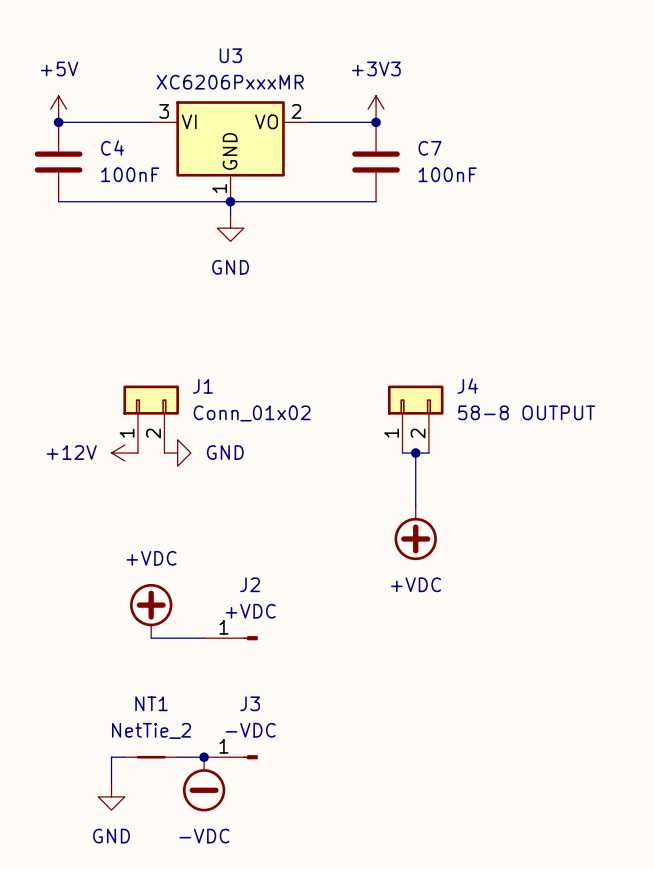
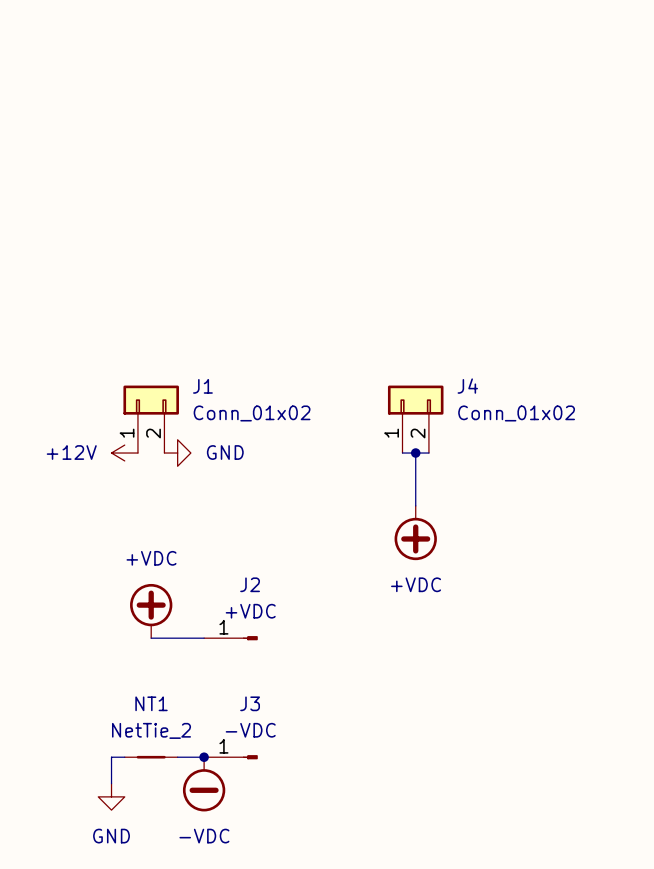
power symbol: +5V (58, 109) -> none
power symbol: +3V3 (376, 109) -> none
wire: (58, 122) (151, 122) -> none
junction: (58, 122) -> none
wire: (309, 122) (376, 122) -> none
junction: (376, 122) -> none
U3: XC6206PxxxMR (230, 151) -> none
C4: 100nF (58, 162) -> none
C7: 100nF (376, 162) -> none
wire: (58, 201) (376, 201) -> none
wire: (230, 201) (230, 214) -> none
junction: (230, 201) -> none
power symbol: GND (230, 228) -> none
J4 value: 58-8 OUTPUT (526, 412) -> Conn_01x02 (516, 413)

